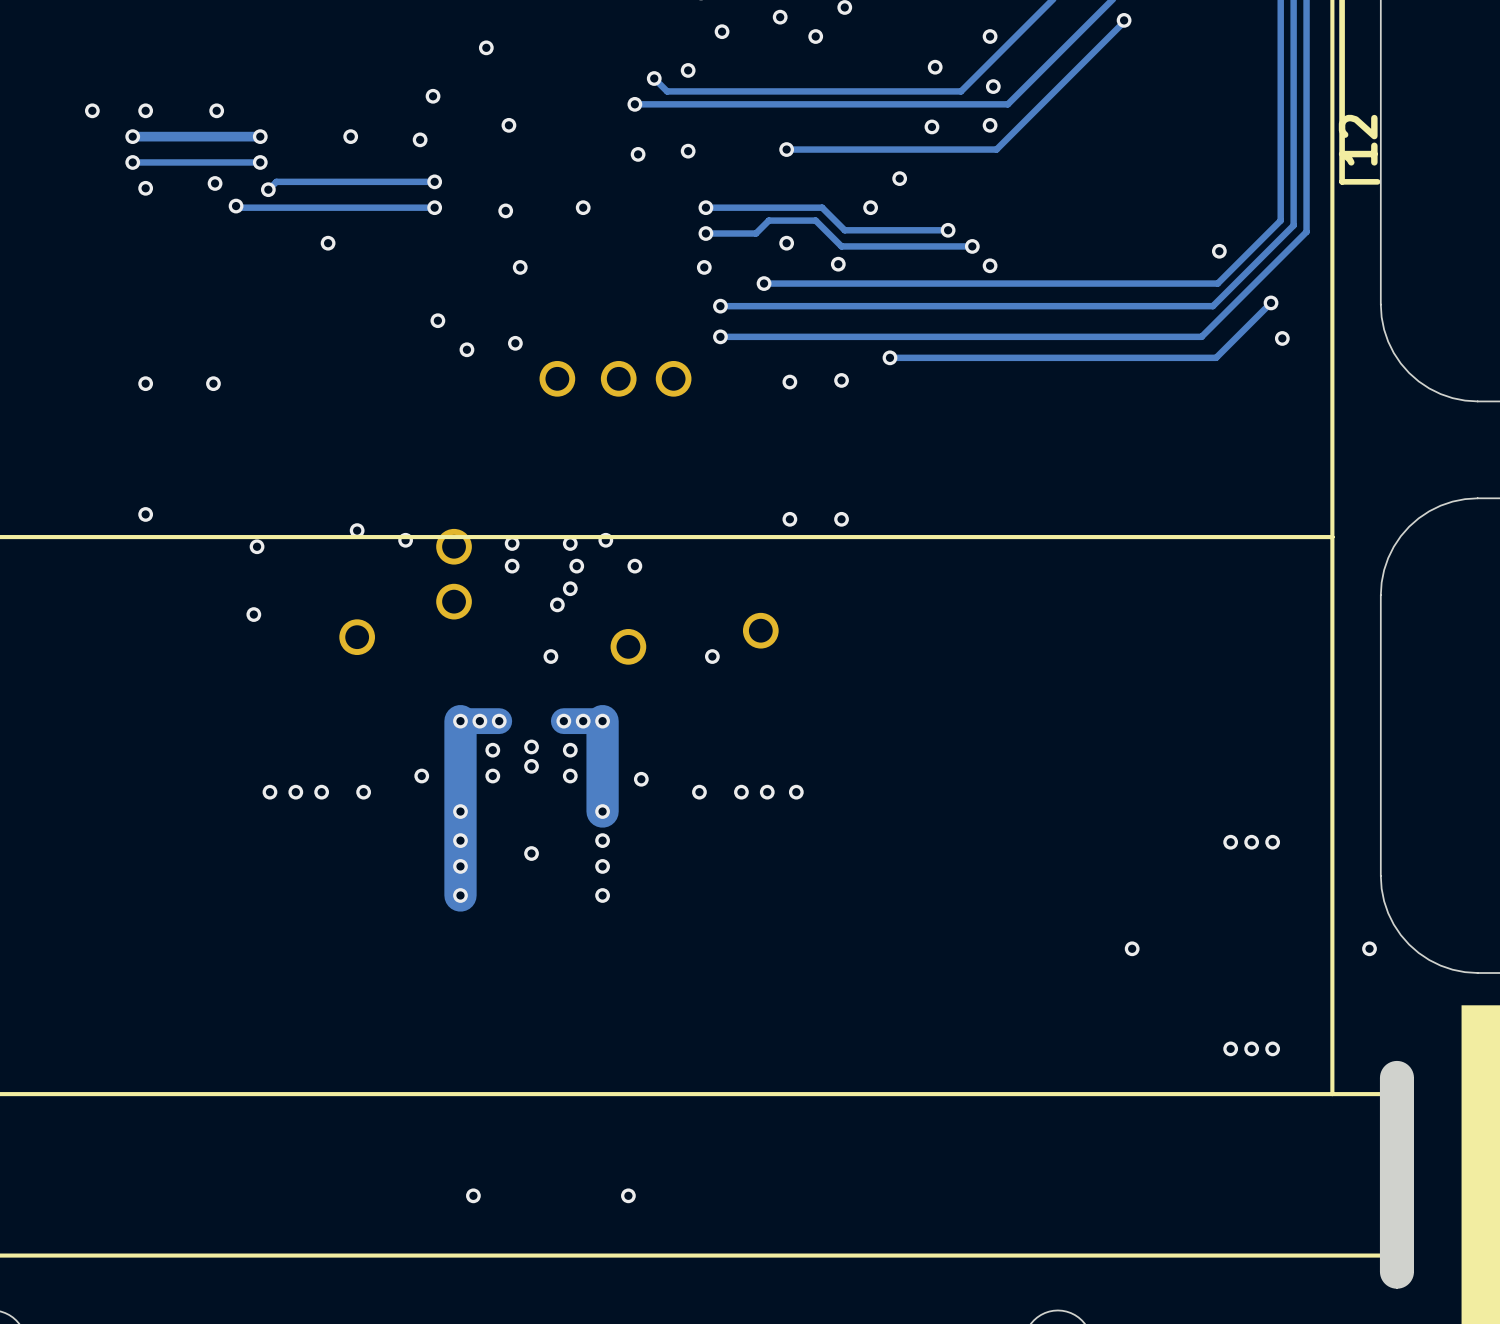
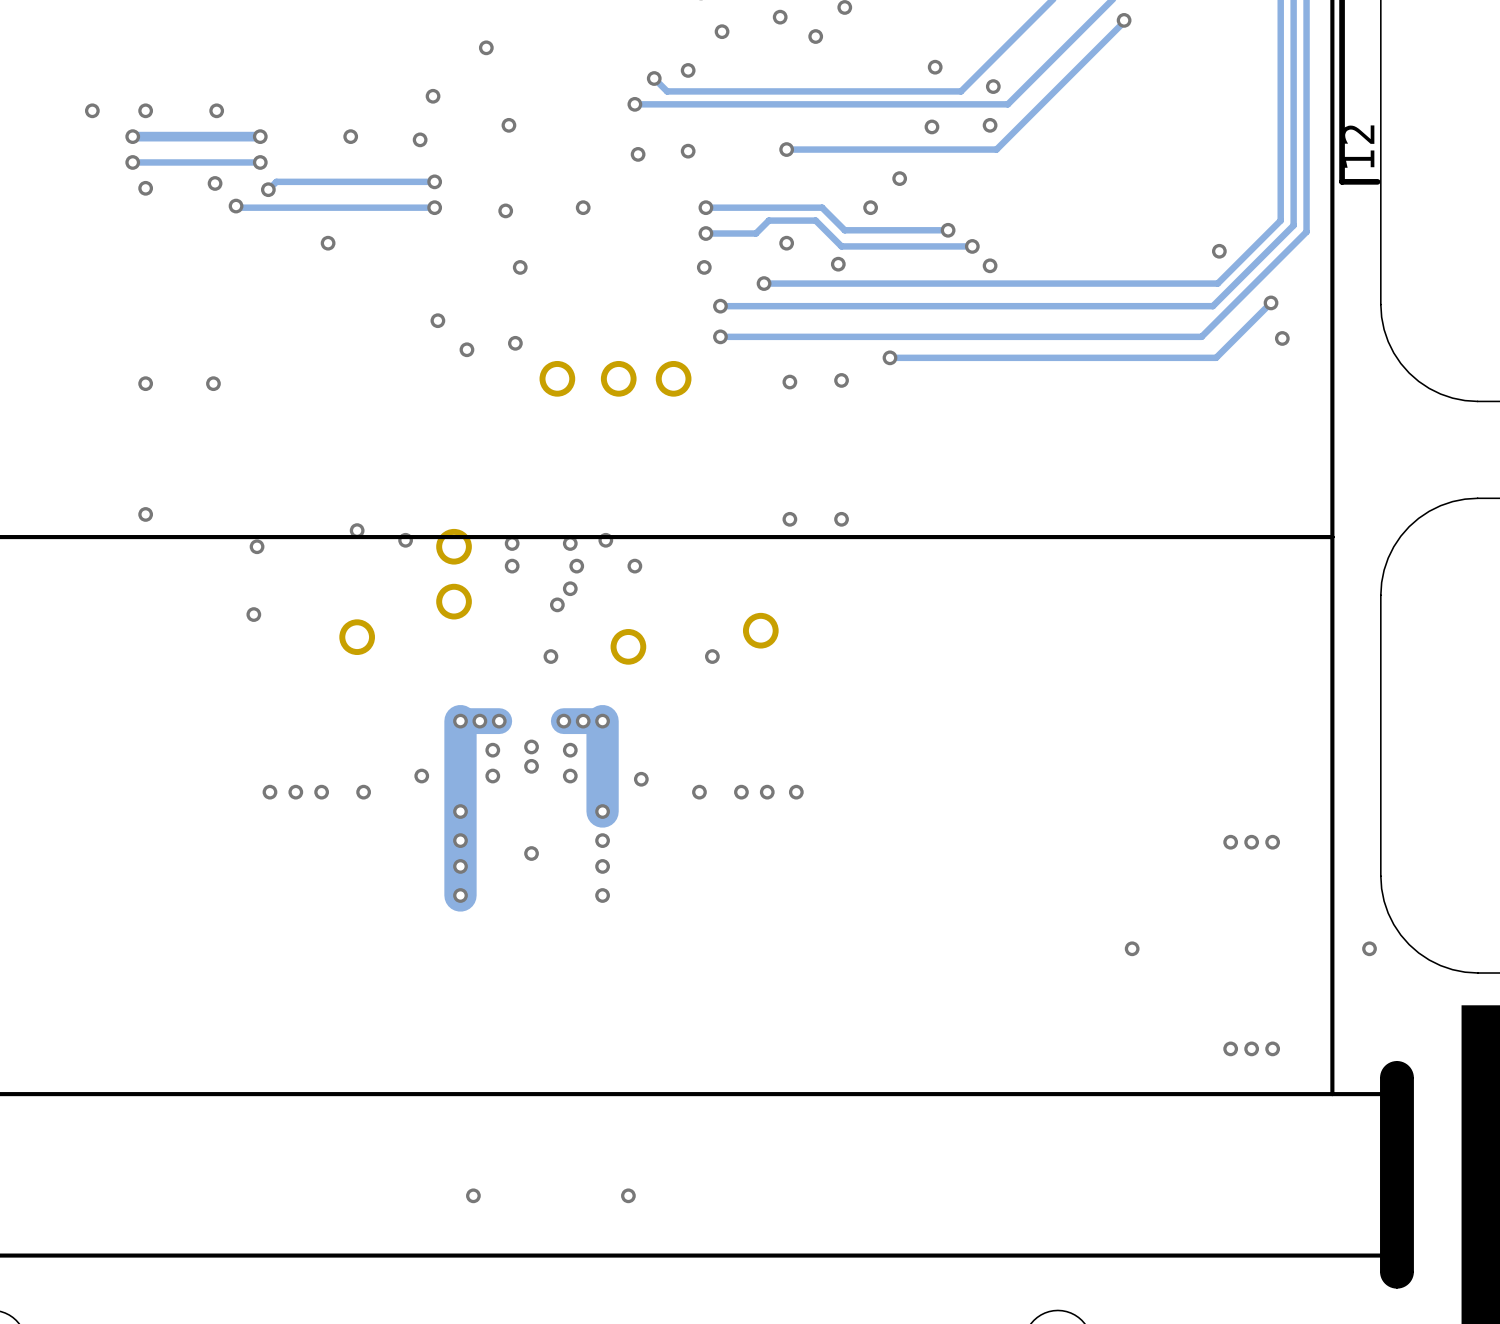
via: (990, 36) -> none

